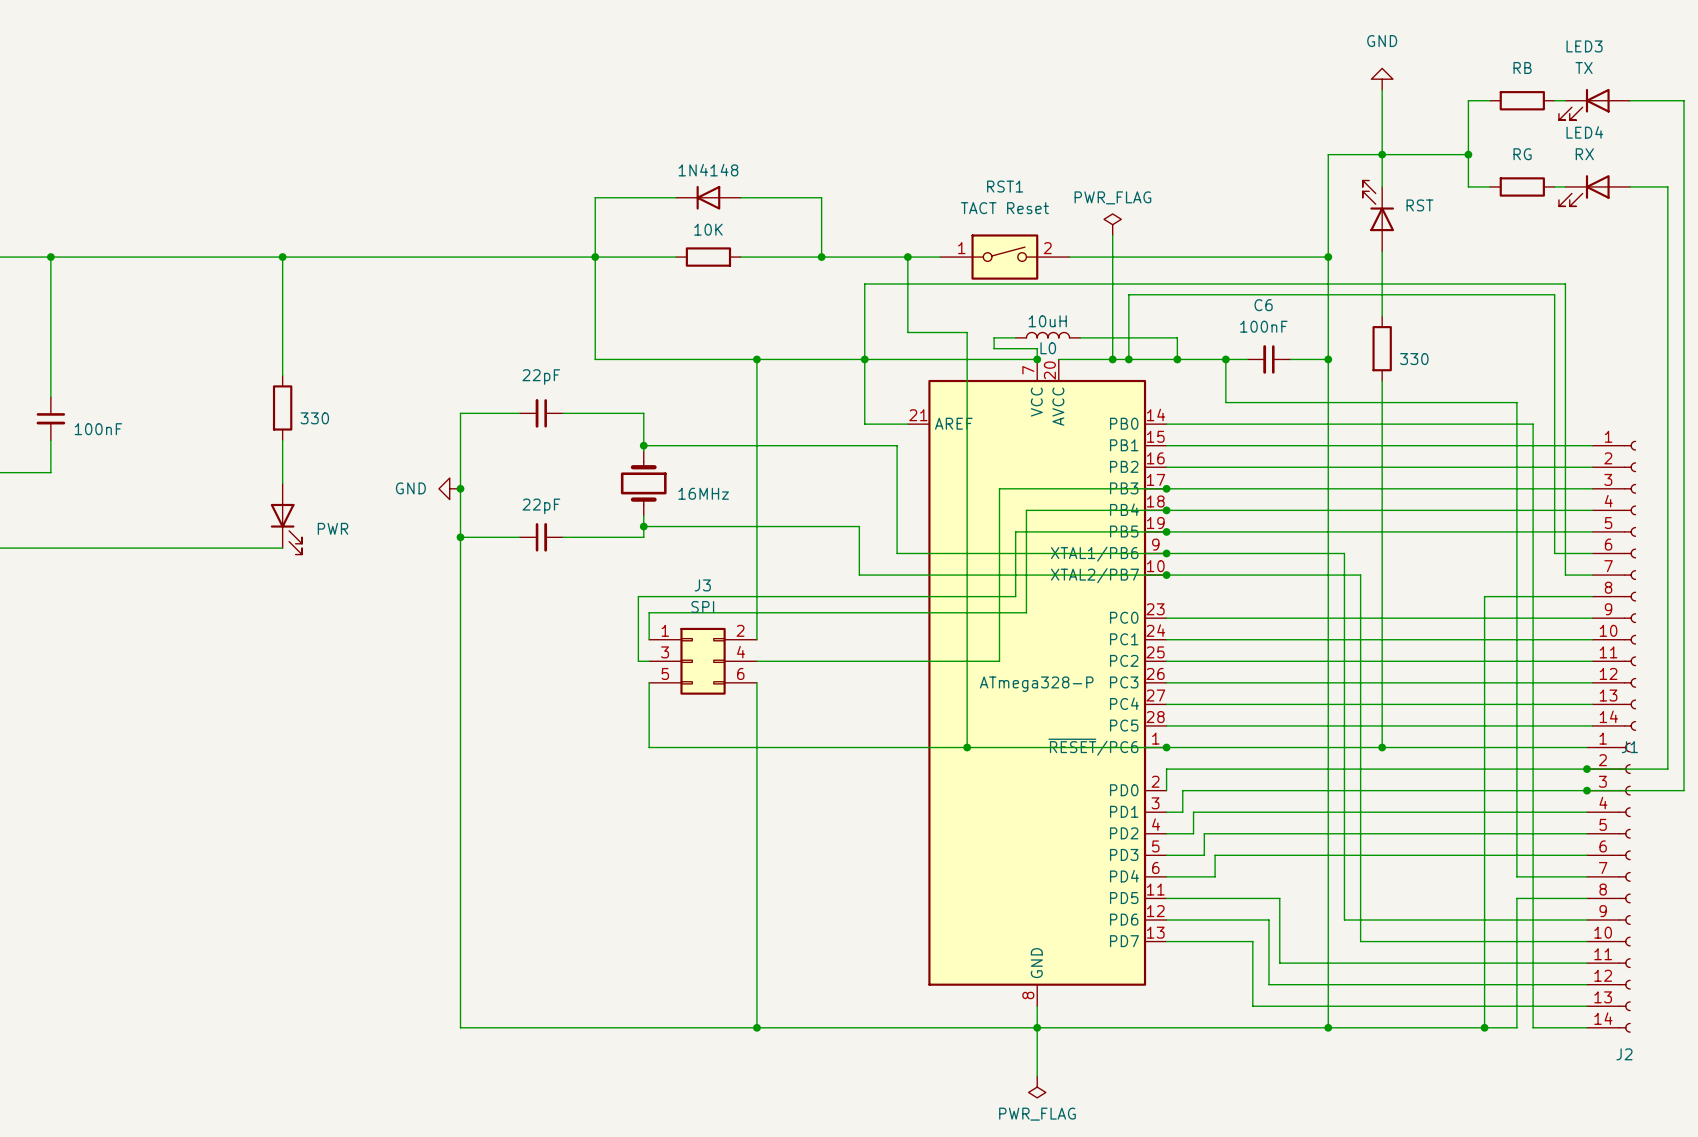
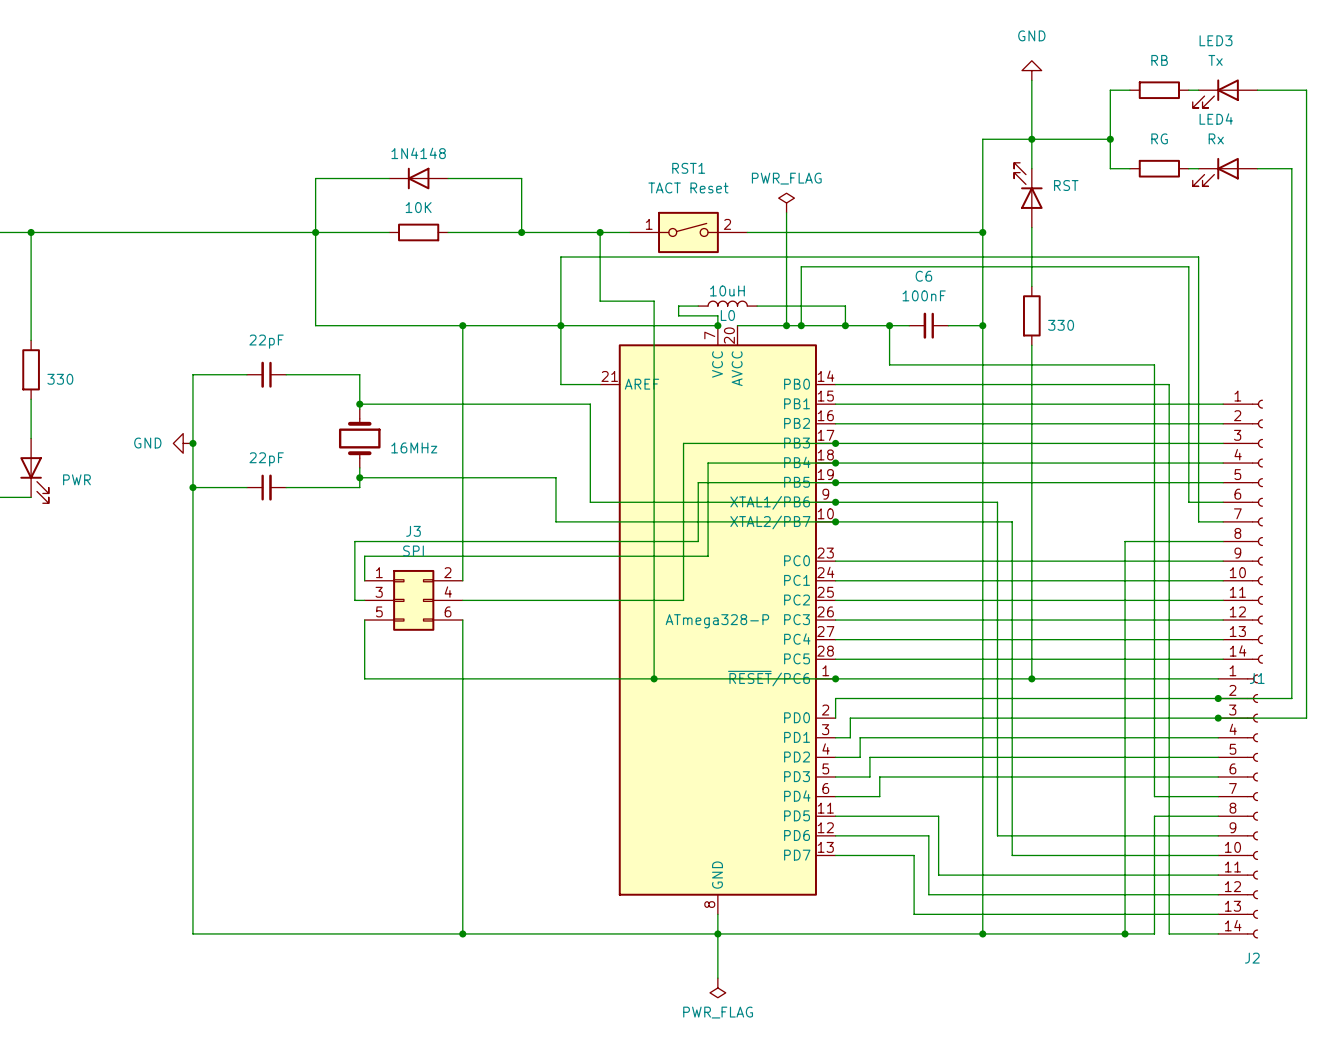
LED3 value: TX (1584, 67) -> Tx (1215, 60)
LED4 value: RX (1584, 154) -> Rx (1216, 138)

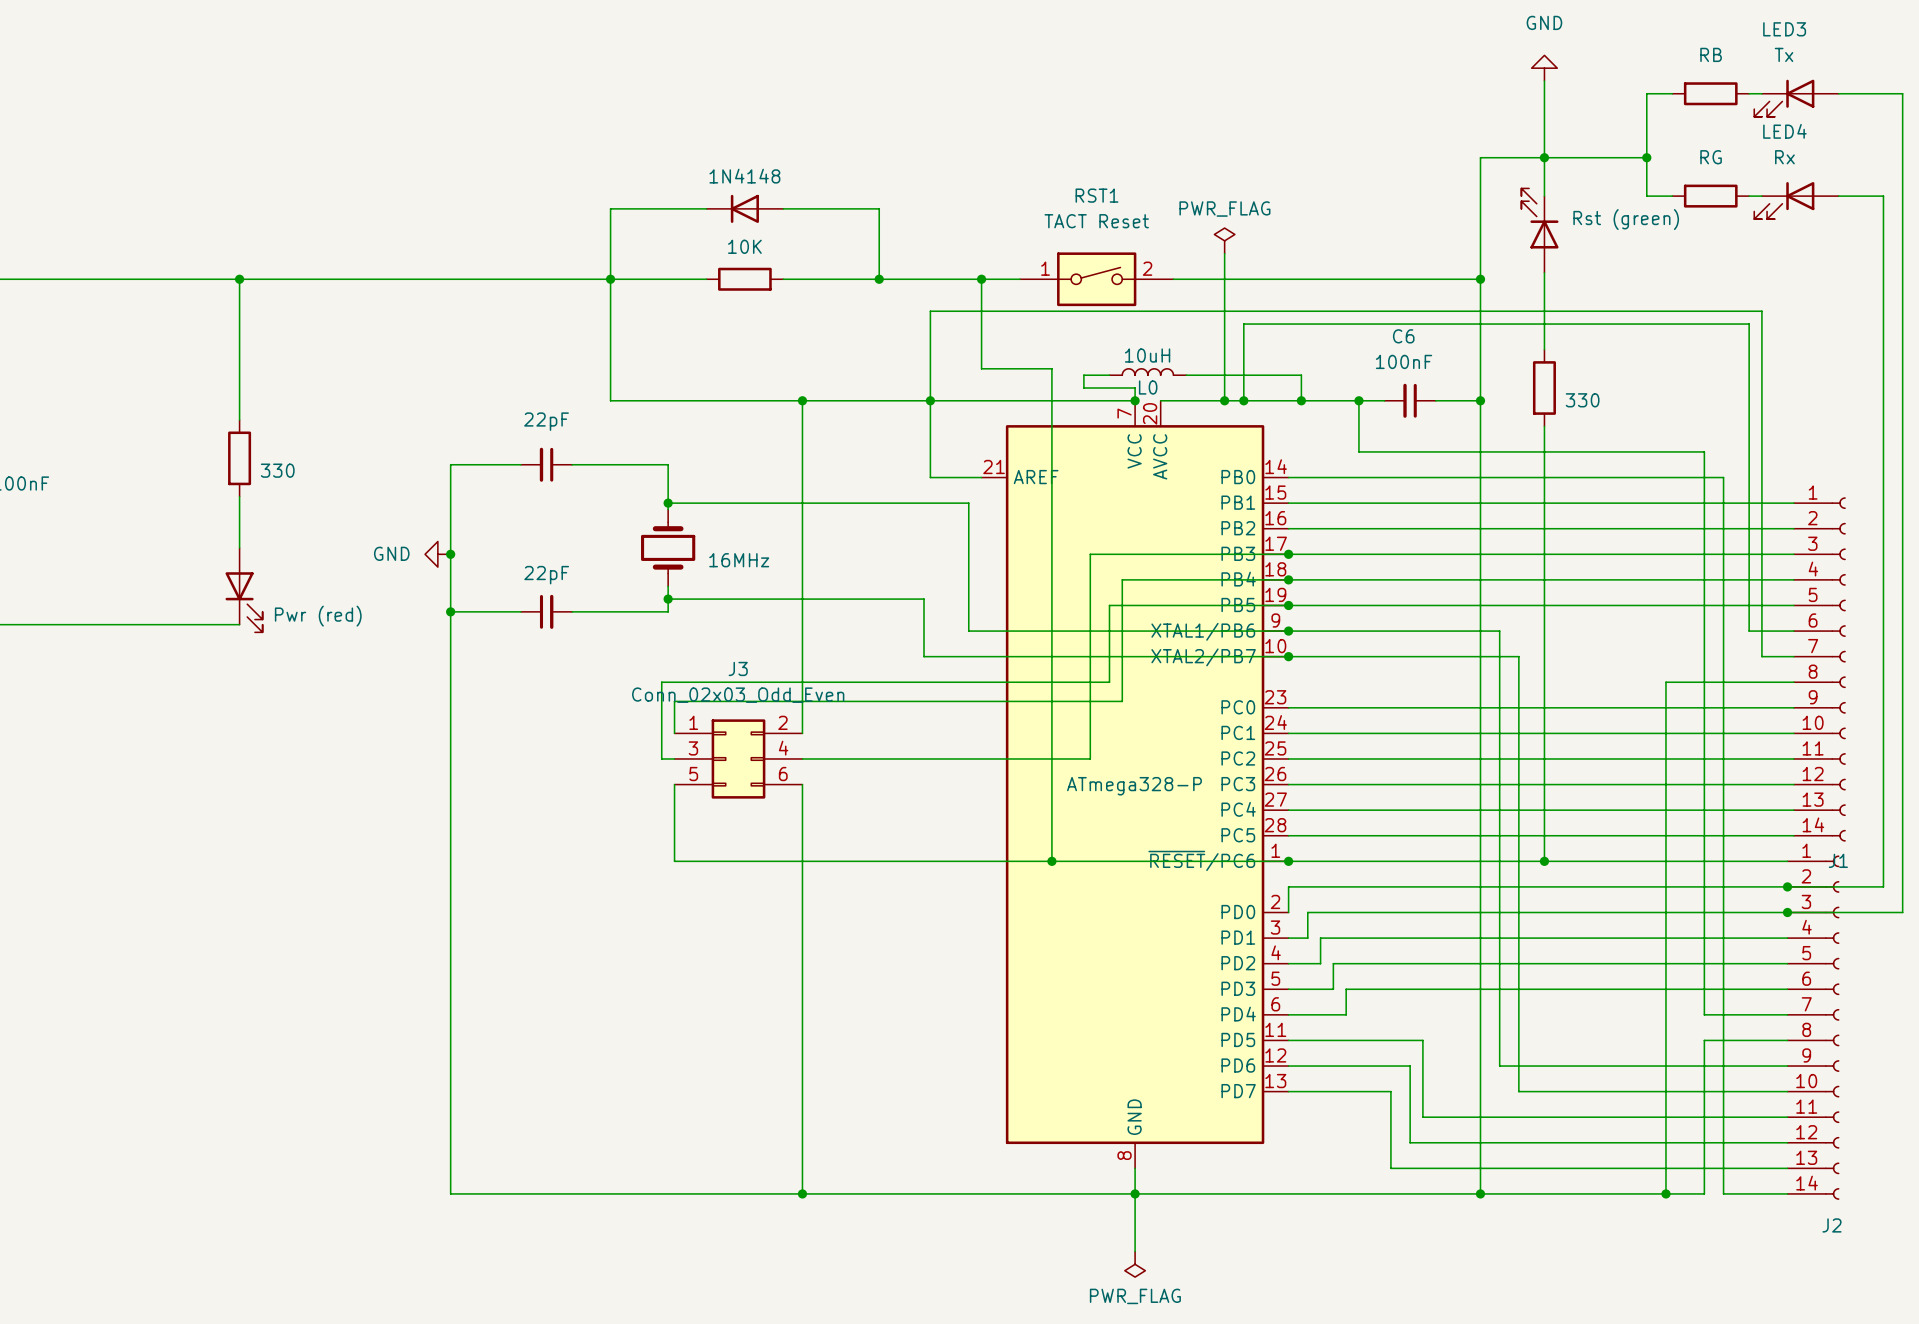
part value: RST (1066, 185) -> Rst (green) (1626, 219)
part value: PWR (76, 479) -> Pwr (red) (318, 616)
J3 value: SPI (413, 550) -> Conn_02x03_Odd_Even (738, 695)

